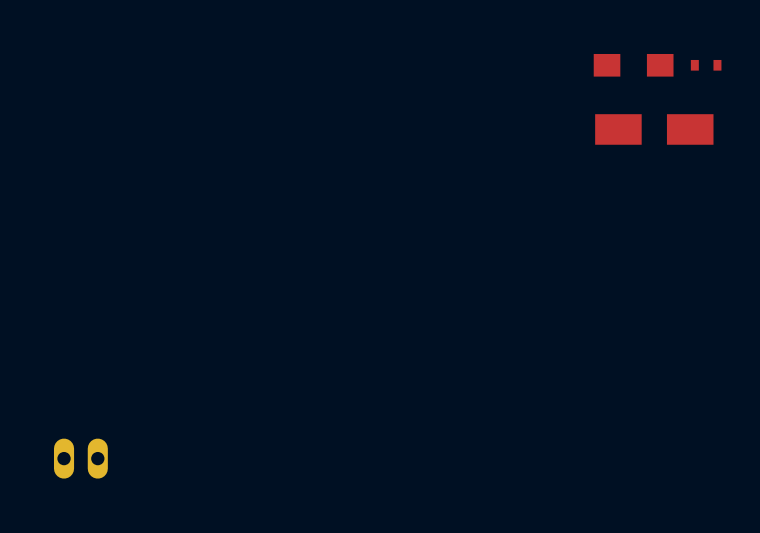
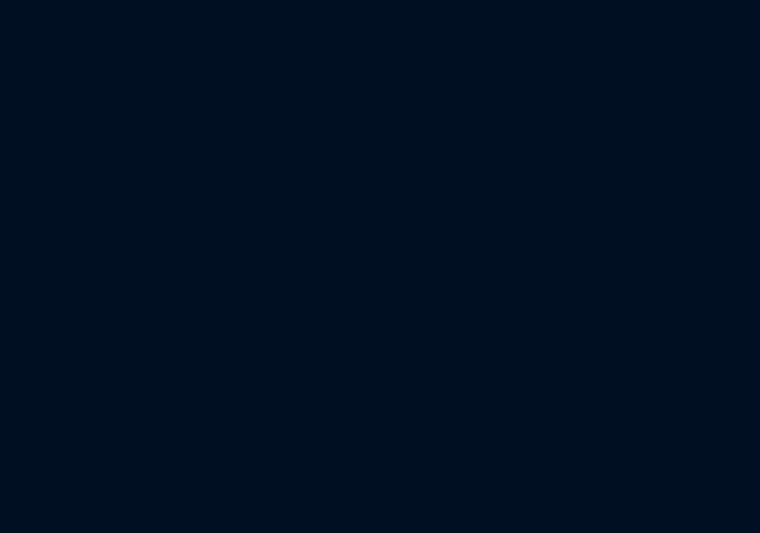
part: (633, 65) -> none
part: (706, 65) -> none
part: (654, 129) -> none
part: (80, 458) -> none

